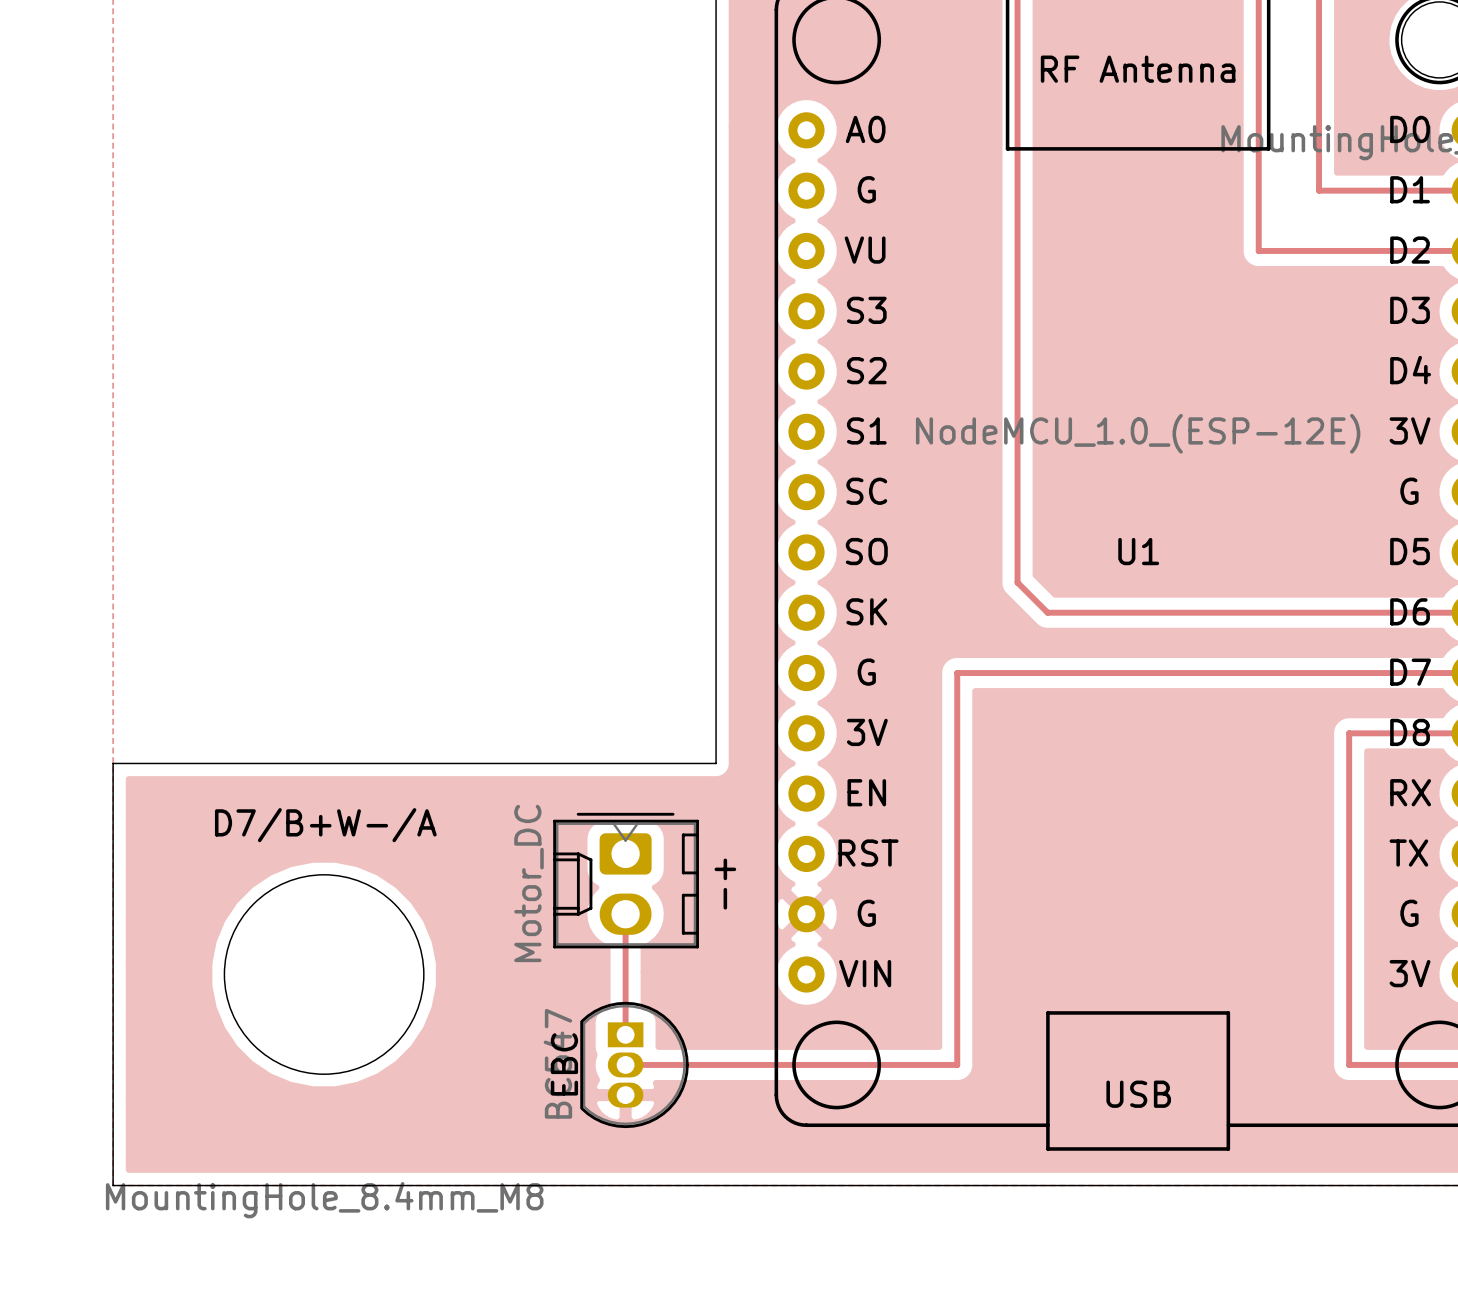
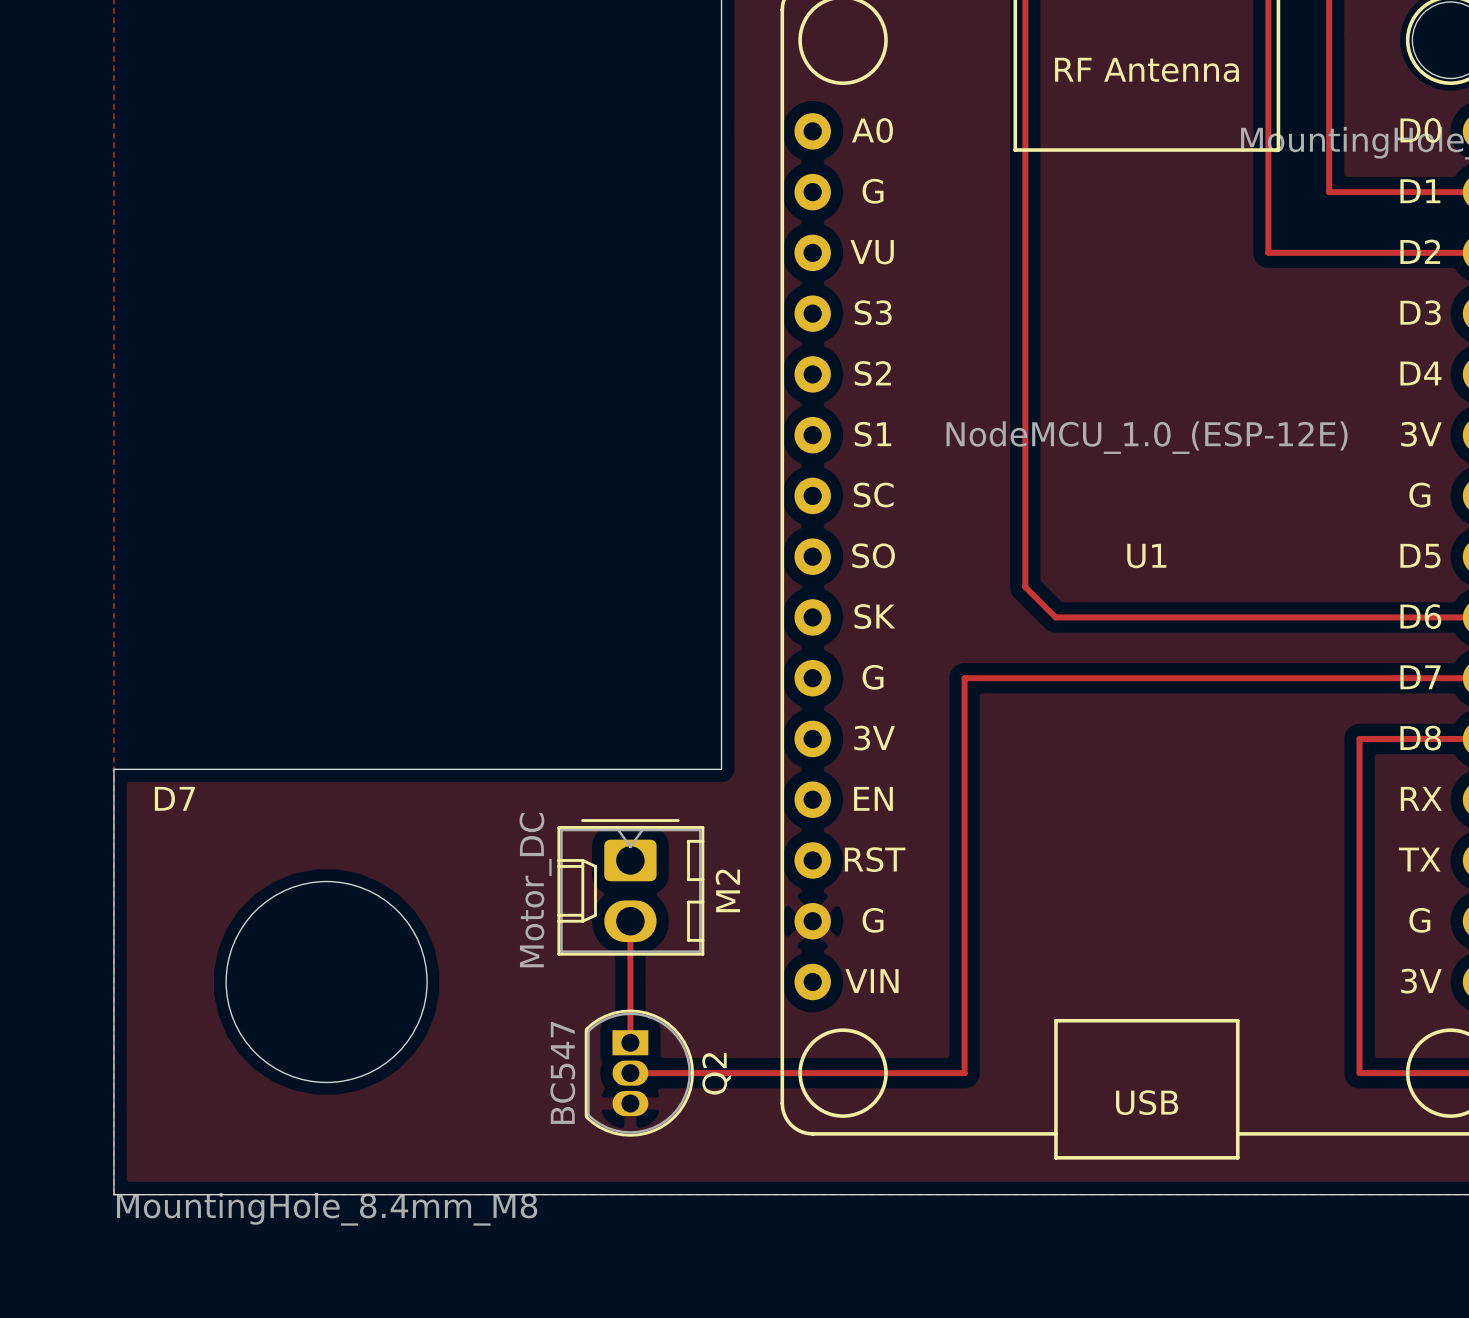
D7/B+W-/A name: D7/B+W-/A (325, 825) -> D7 (174, 798)
M2 name: -+ (725, 884) -> M2 (727, 890)
EBC name: EBC (564, 1064) -> Q2 (716, 1073)

